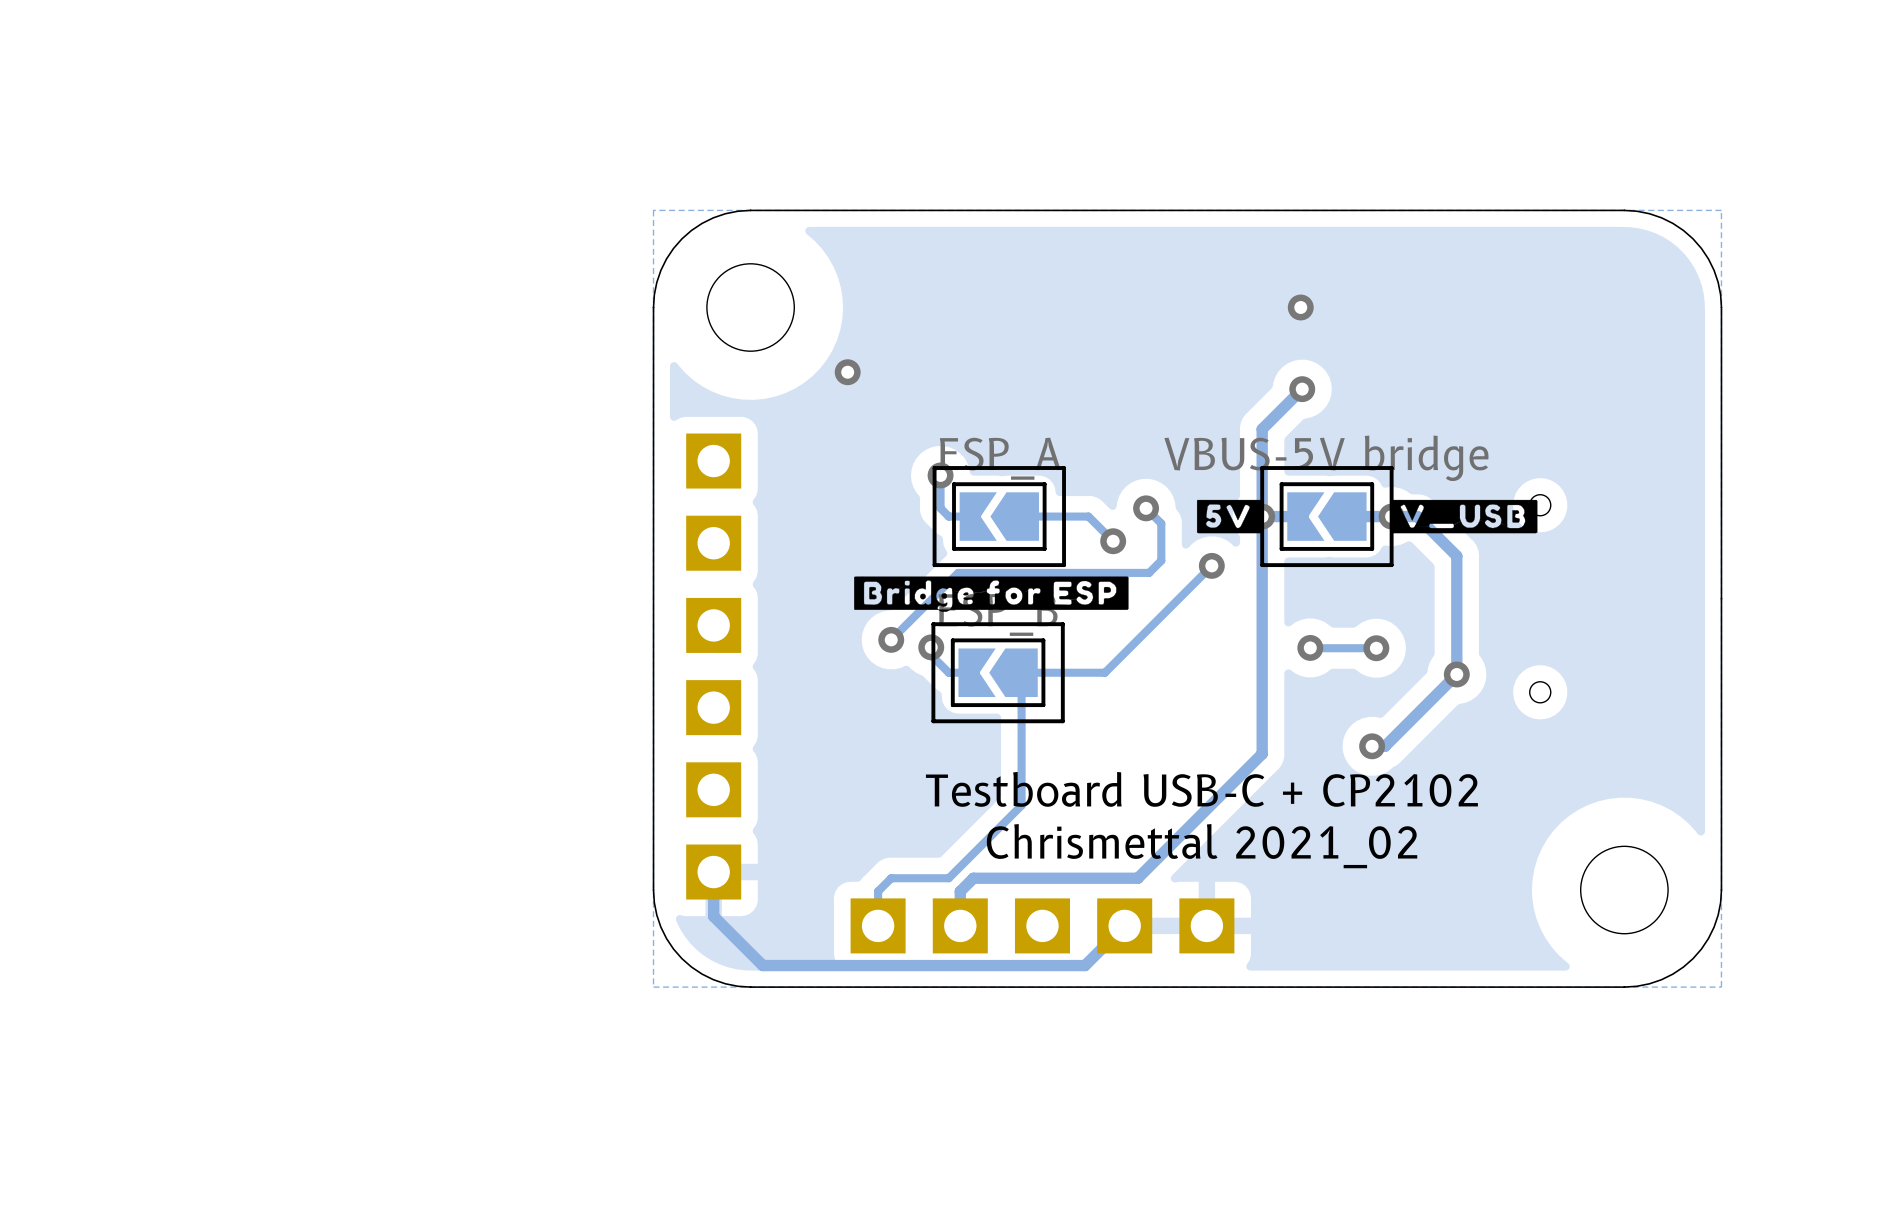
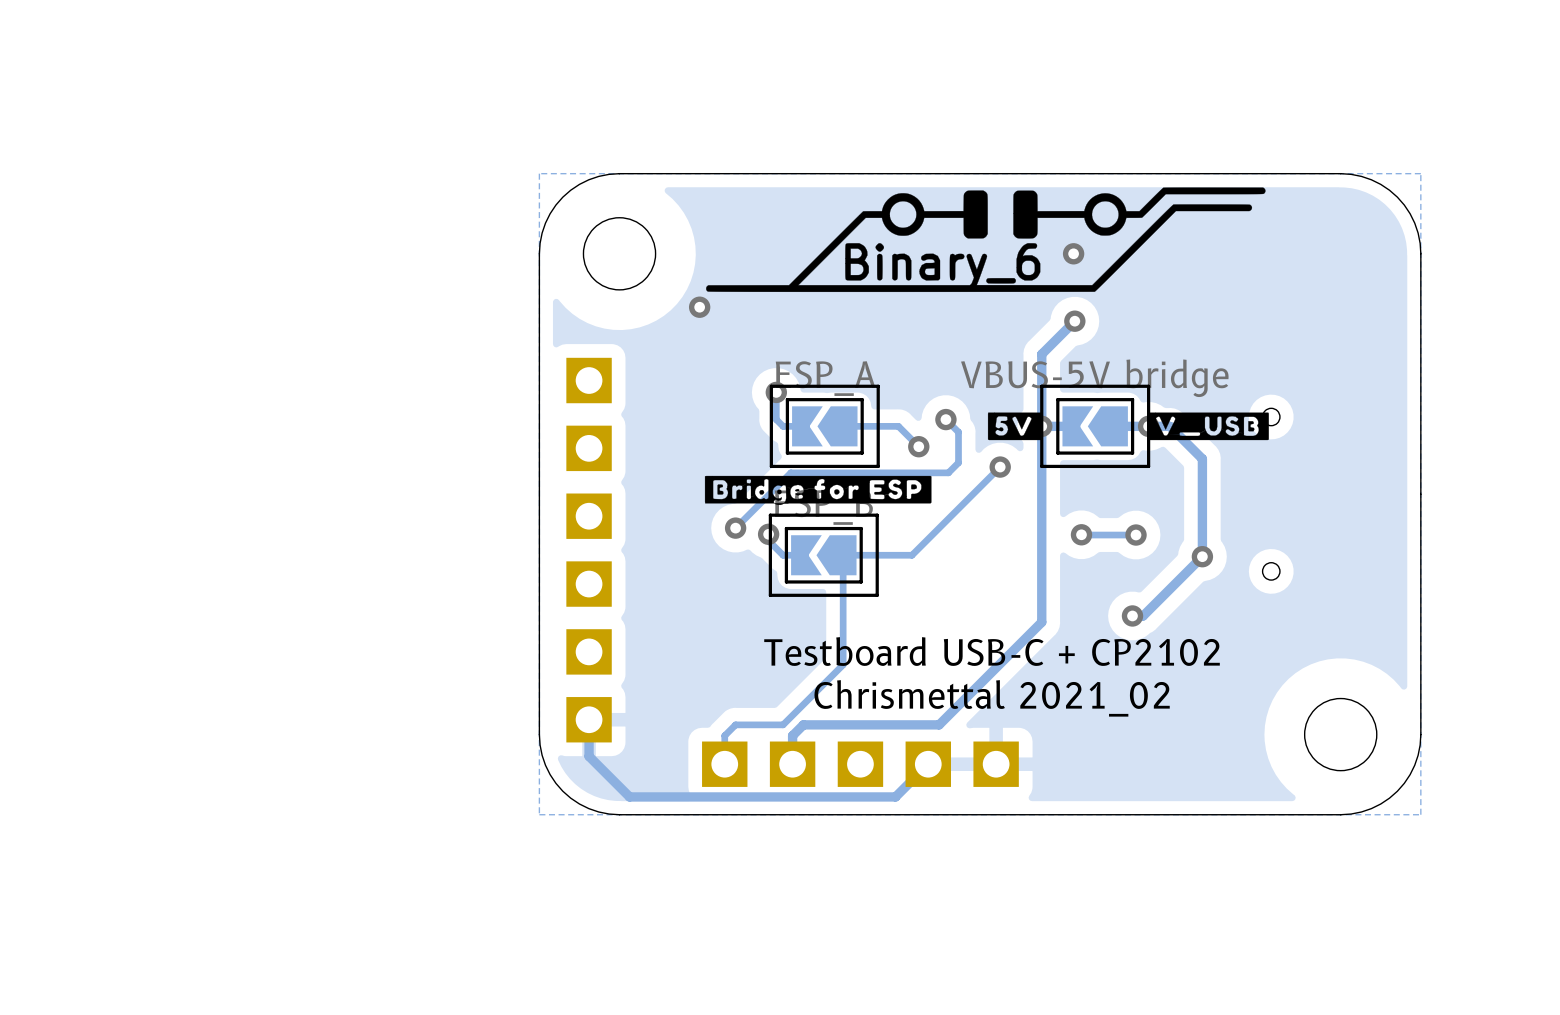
drawing: none -> [706, 187, 1266, 293]

